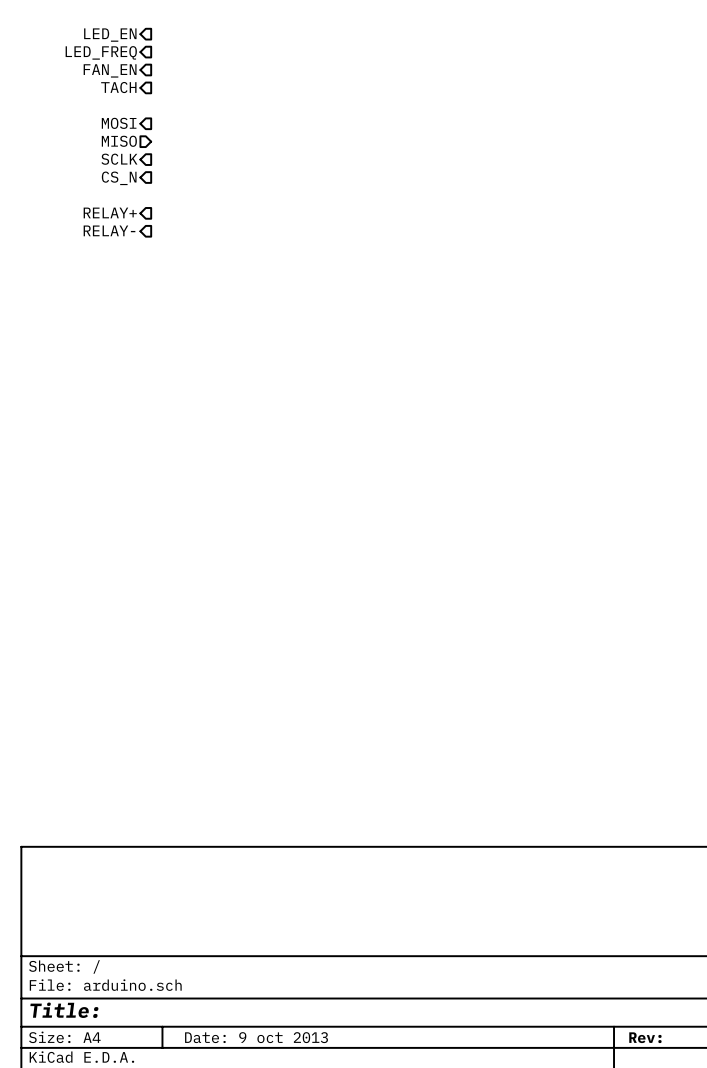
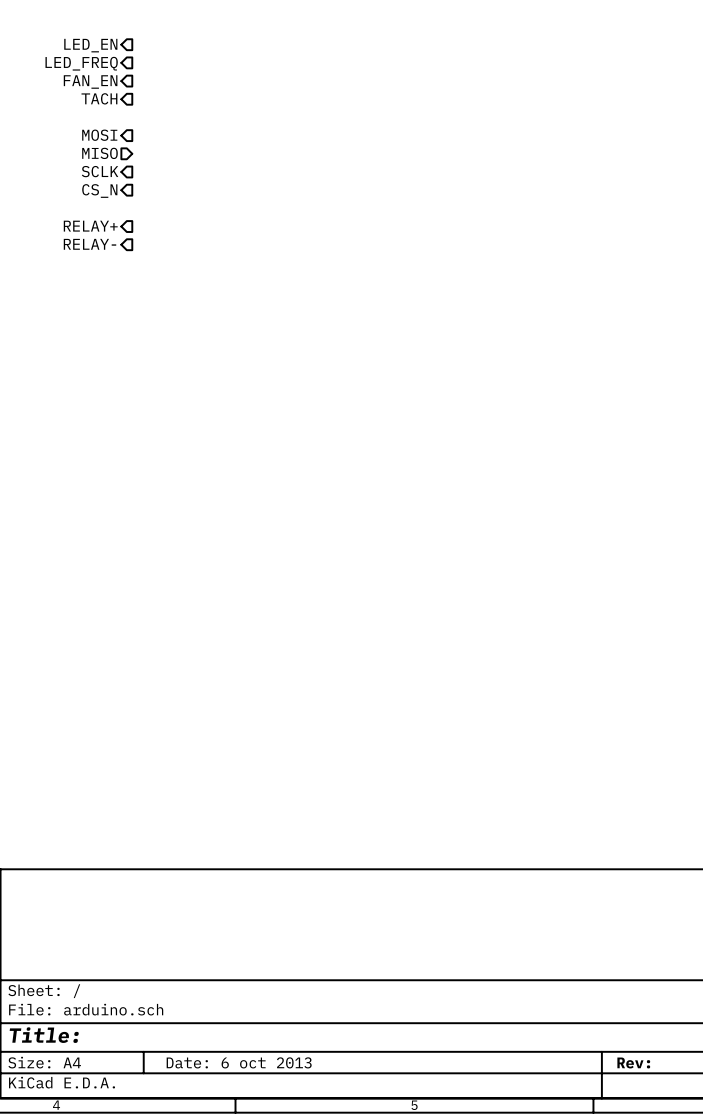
title block: Date: 9 oct 2013 (256, 1037) -> Date: 6 oct 2013 (239, 1062)

